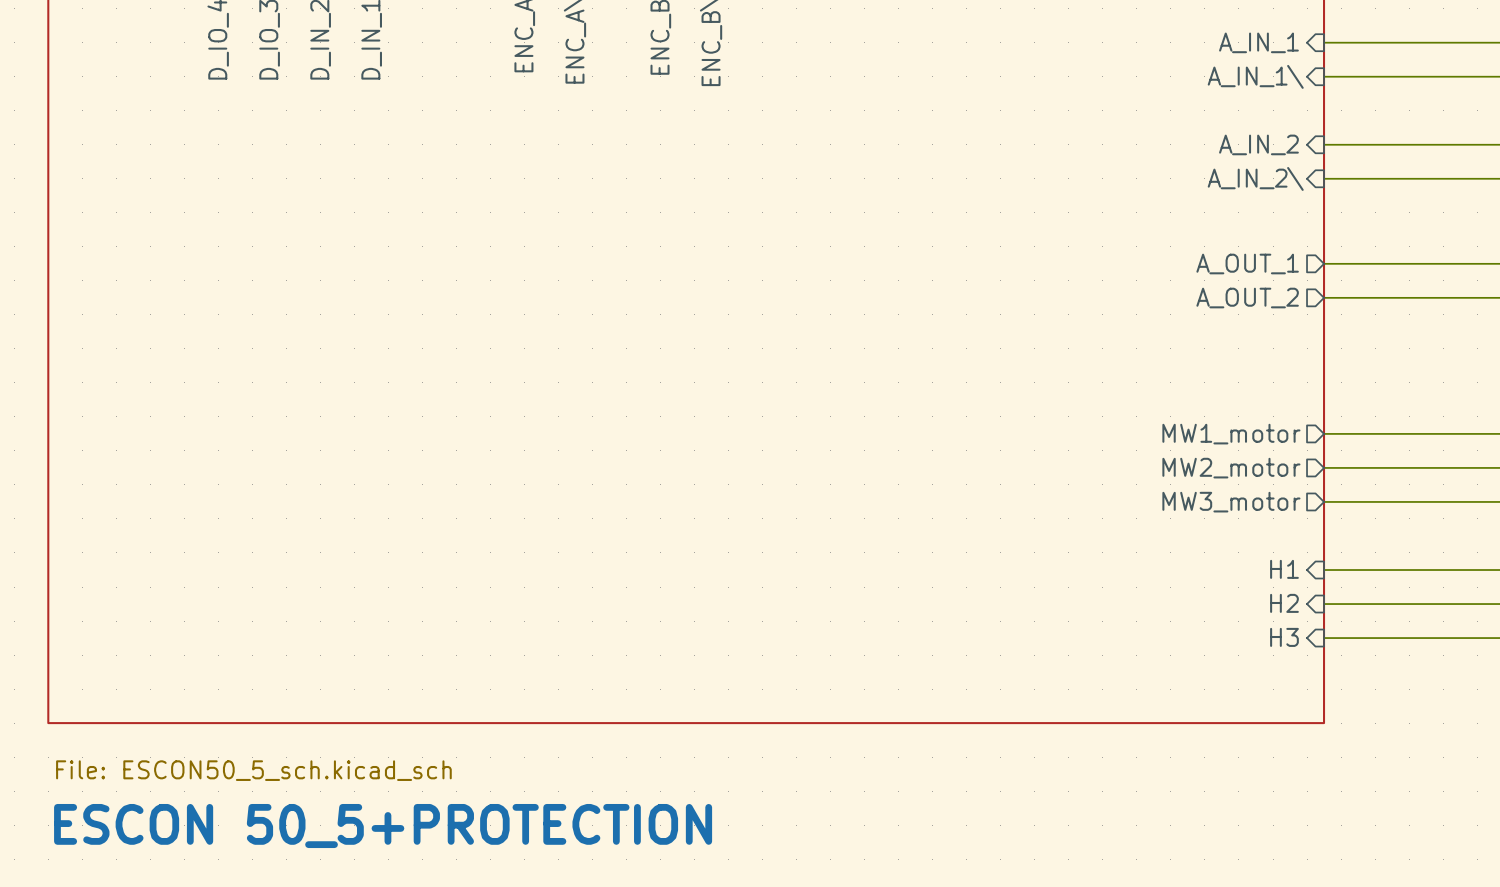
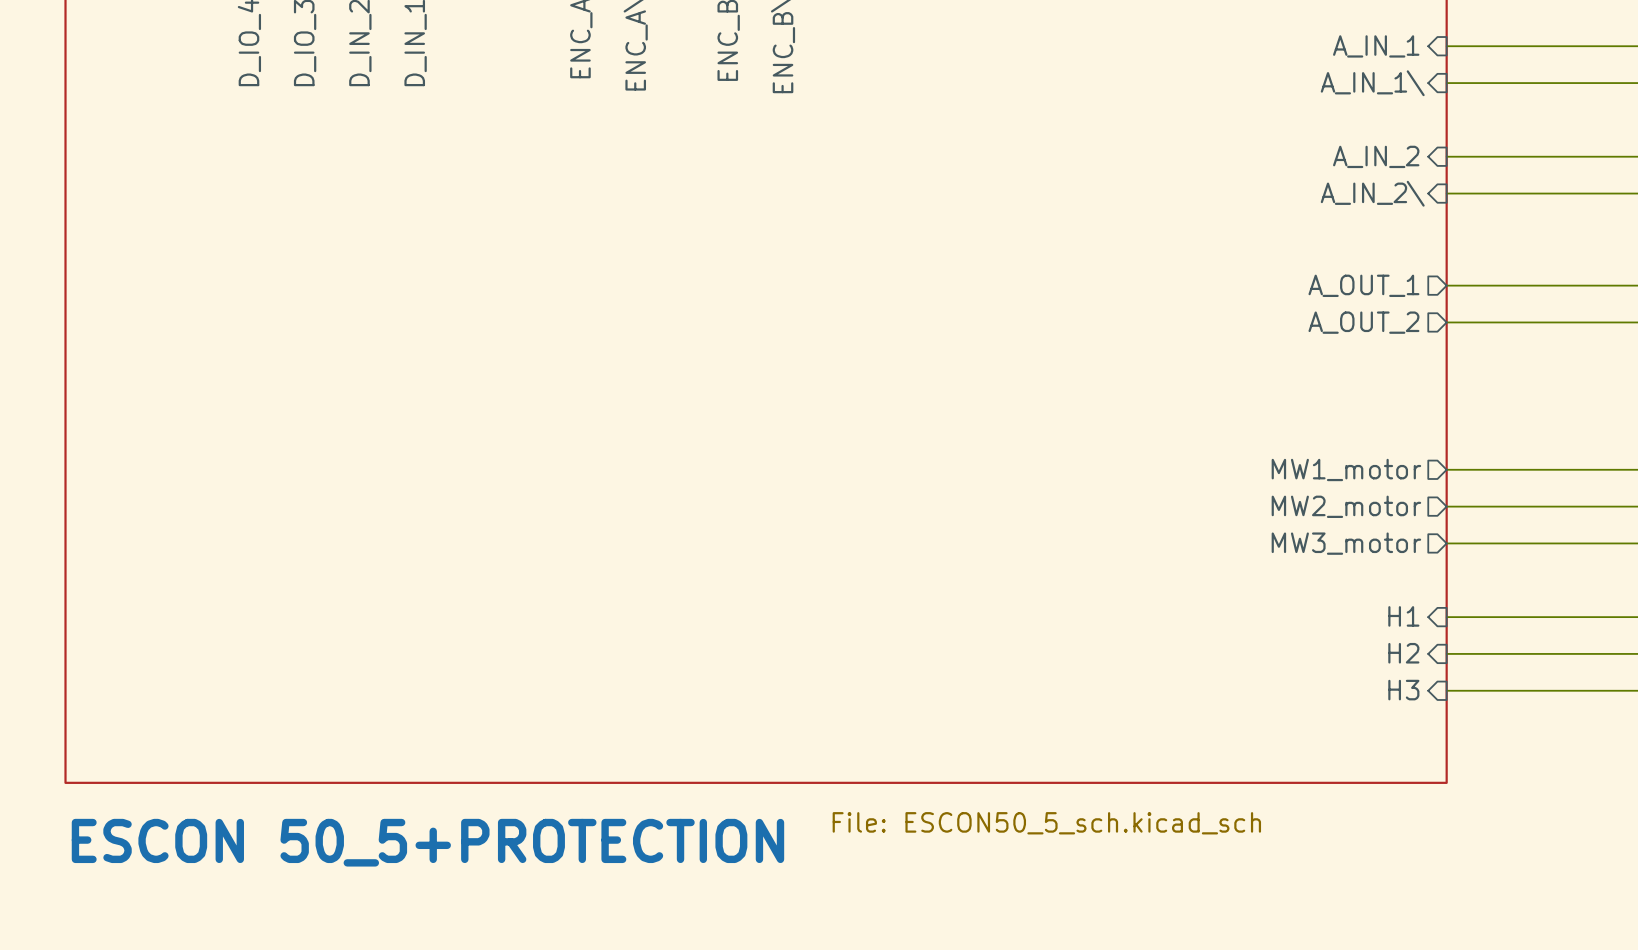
sheet ESCON 50_5+PROTECTION value position: File: ESCON50_5_sch.kicad_sch (253, 770) -> File: ESCON50_5_sch.kicad_sch (1046, 823)
sheet ESCON 50_5+PROTECTION name position: ESCON 50_5+PROTECTION (383, 826) -> ESCON 50_5+PROTECTION (427, 842)

